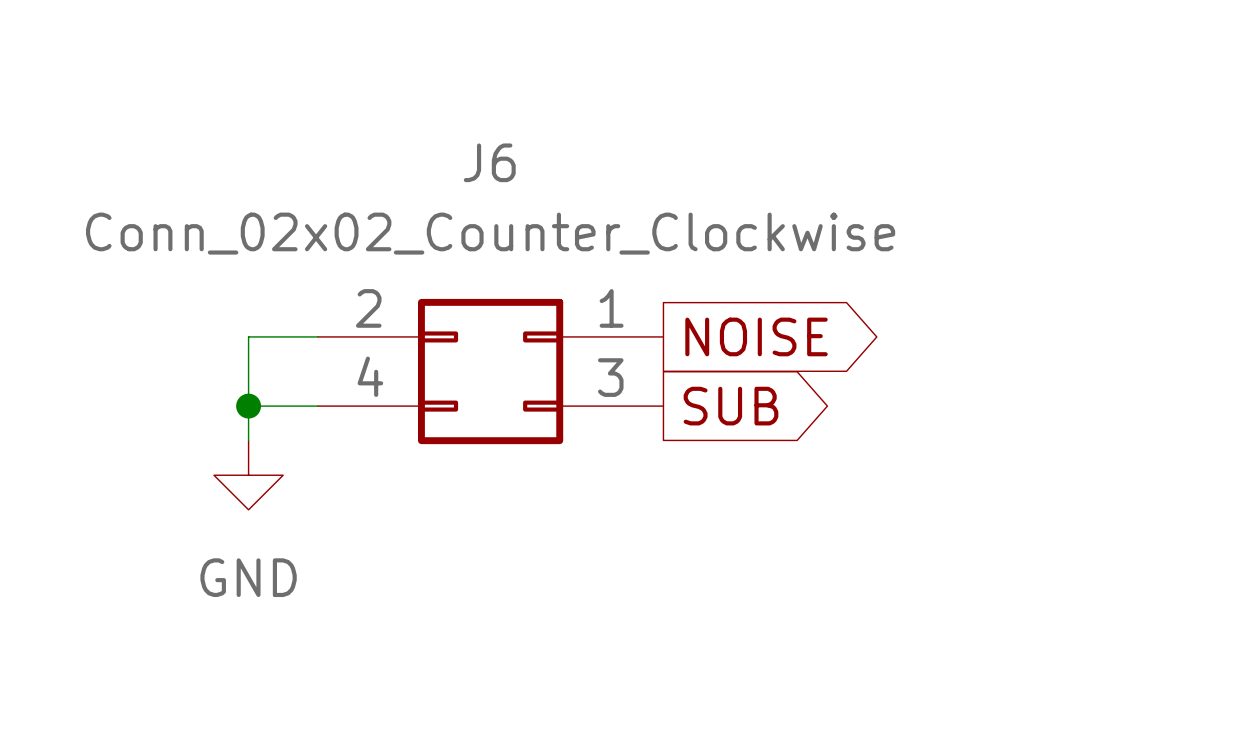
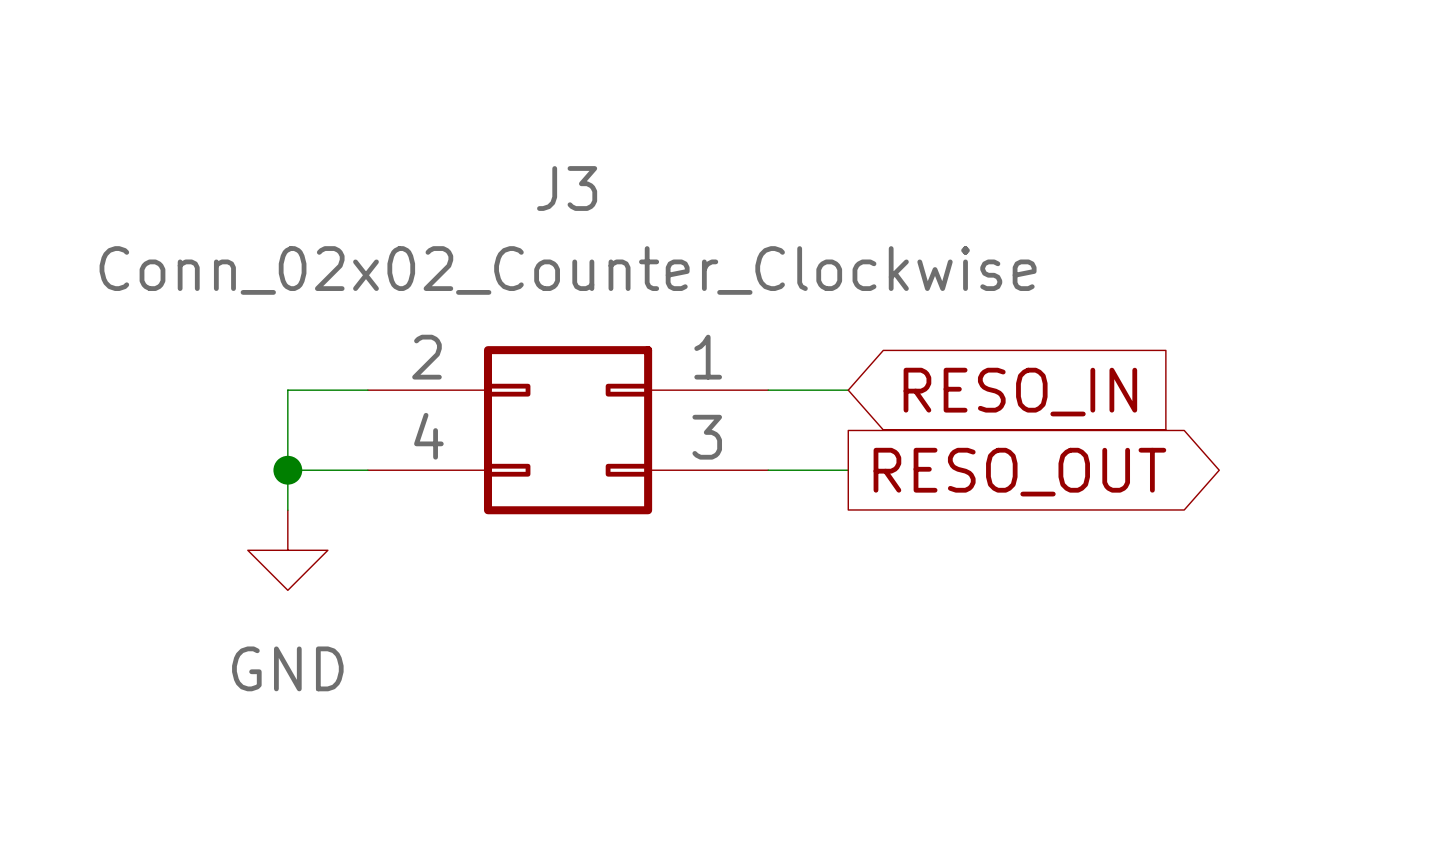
J6 name: J6 (489, 162) -> J3 (567, 188)
wire: none -> (768, 390) (848, 390)
global label: NOISE (756, 336) -> none
global label: none -> RESO_IN (1020, 392)
wire: none -> (768, 470) (848, 470)
global label: SUB (731, 406) -> none
global label: none -> RESO_OUT (1019, 472)

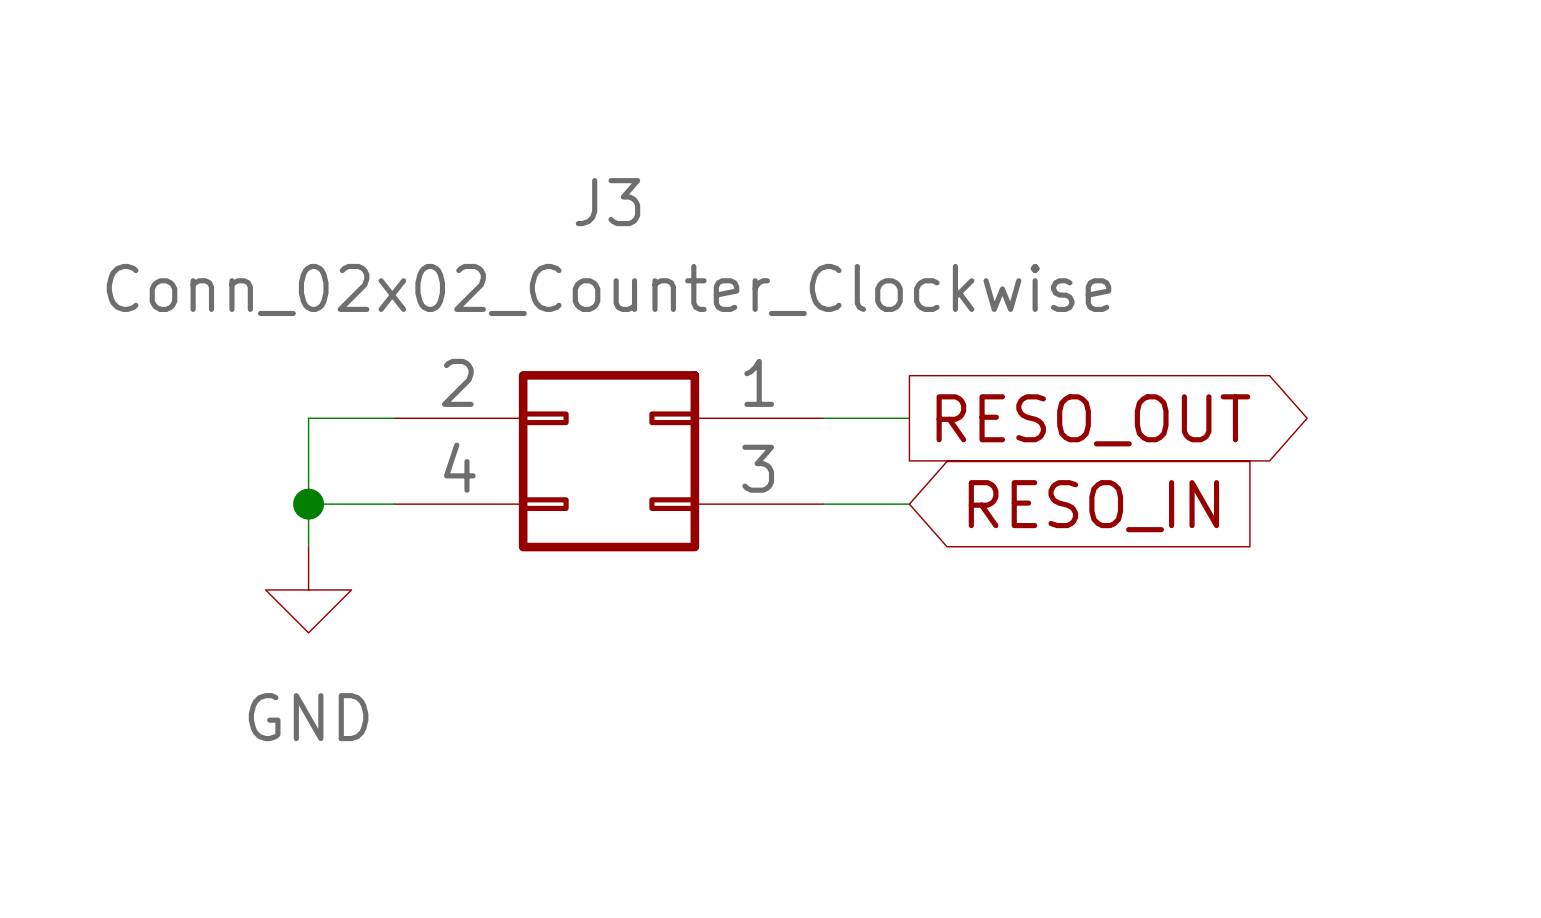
global label shape: input (1020, 392) -> output (1093, 420)
global label: RESO_IN (1020, 392) -> RESO_OUT (1093, 420)
global label shape: output (1019, 472) -> input (1093, 506)
global label: RESO_OUT (1019, 472) -> RESO_IN (1093, 506)

